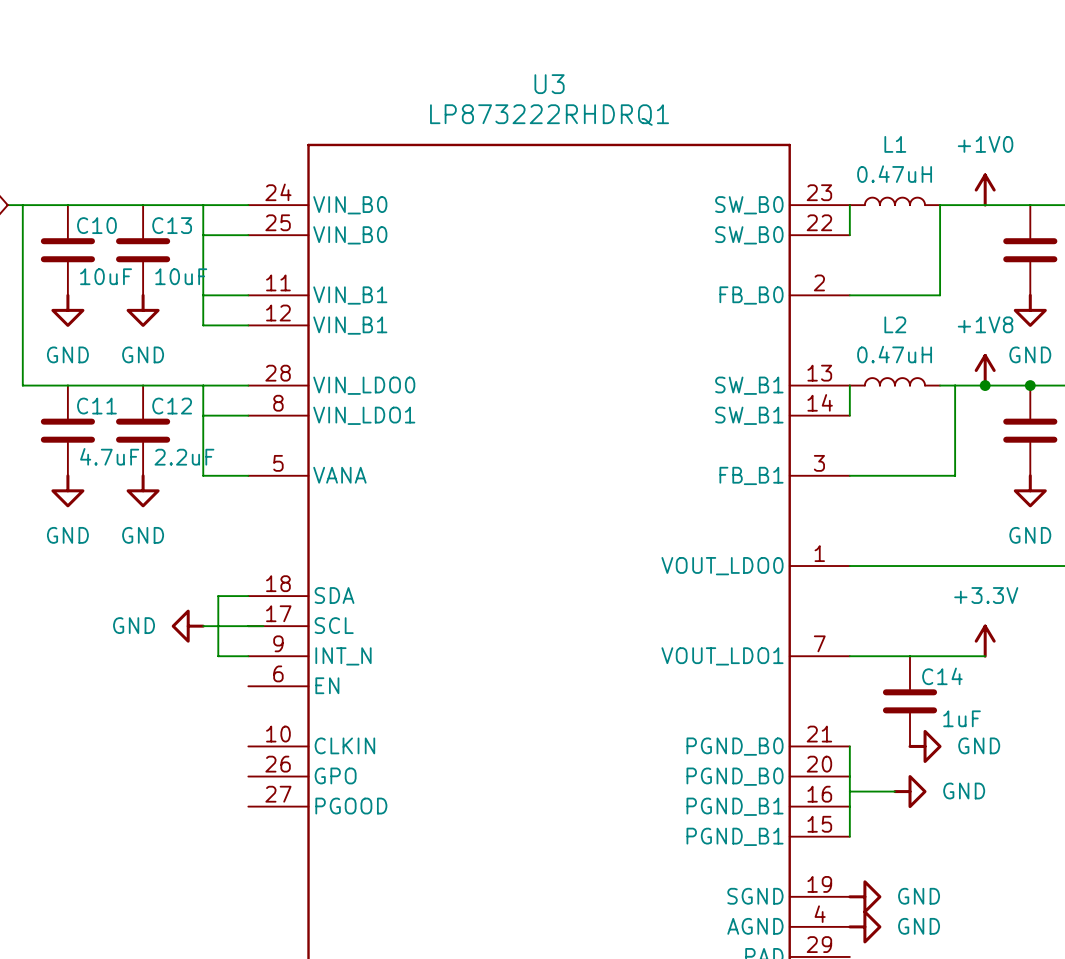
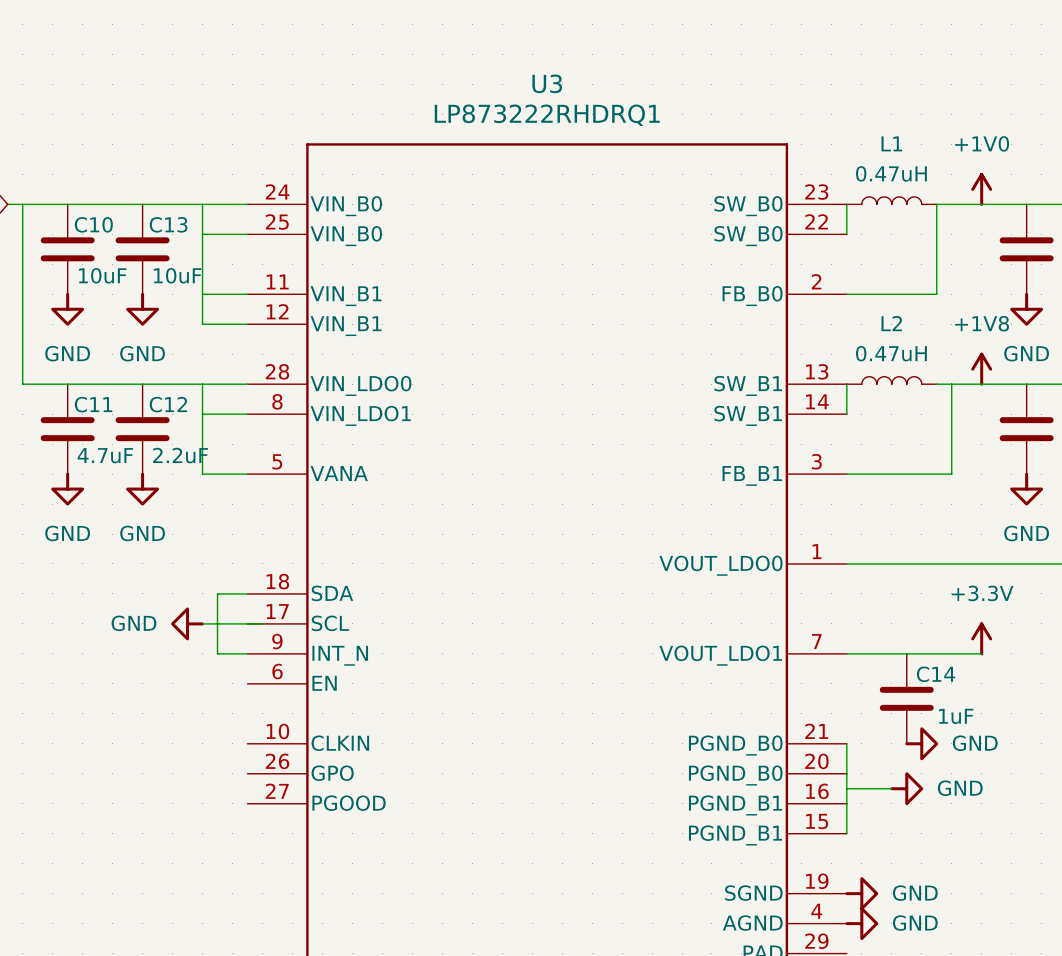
junction: (985, 385) -> none
junction: (1030, 385) -> none

